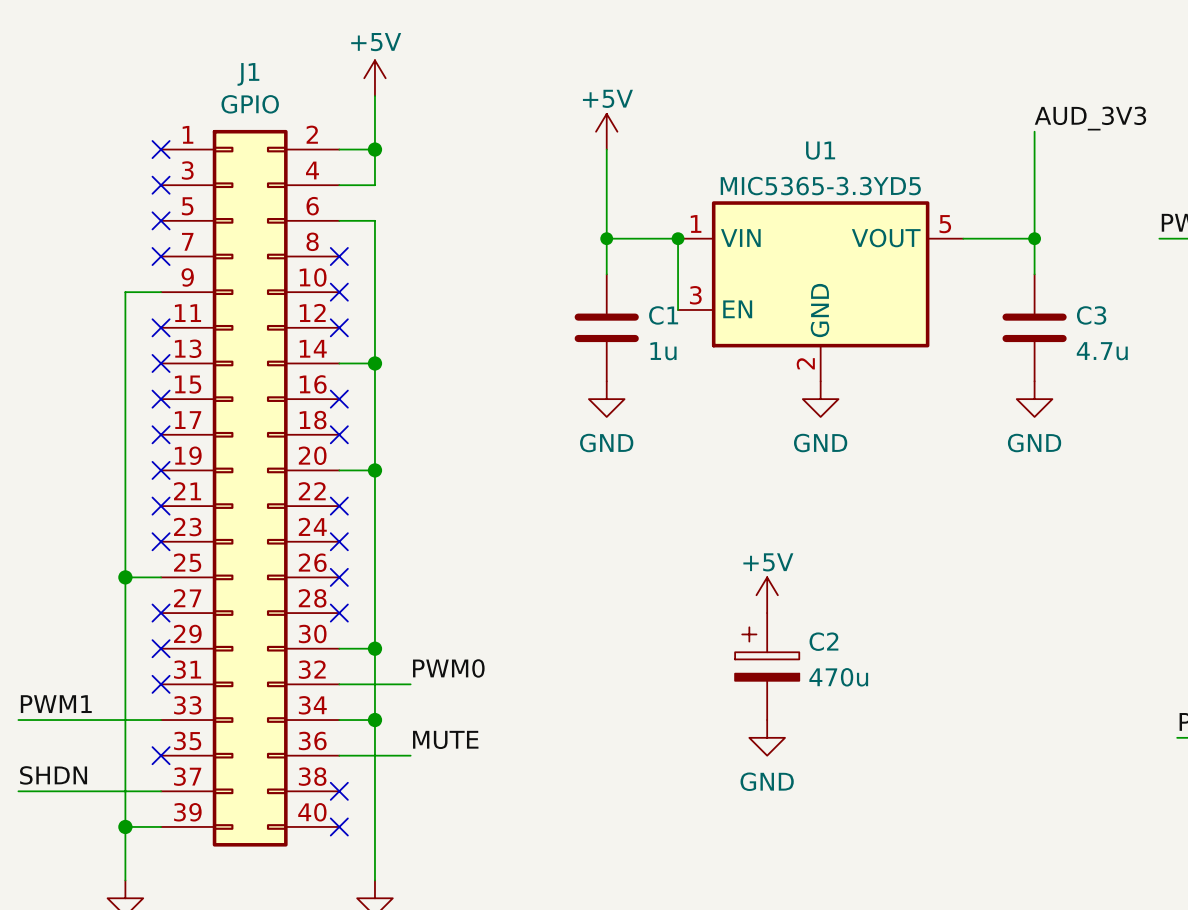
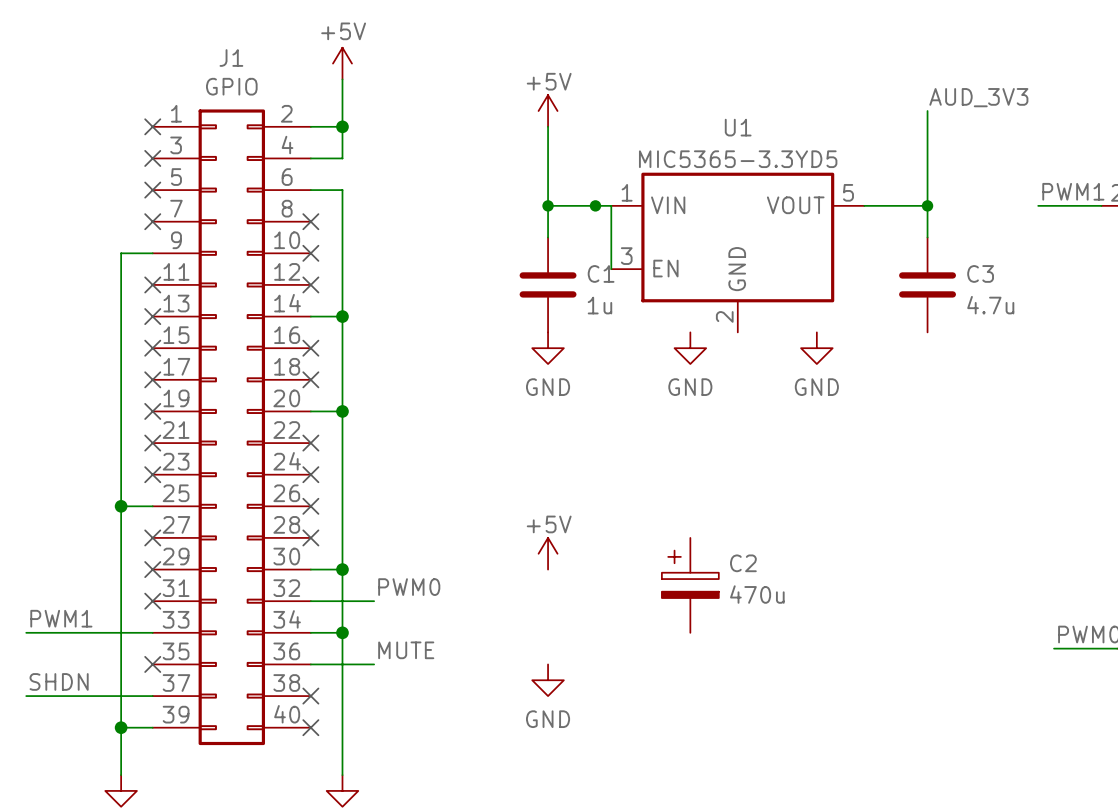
junction position: (678, 238) -> (595, 205)
power symbol: none -> GND (690, 348)
power symbol: GND (820, 399) -> none
power symbol: none -> GND (816, 348)
power symbol: GND (1034, 399) -> none
power symbol position: +5V (767, 595) -> +5V (548, 553)
power symbol position: GND (767, 737) -> GND (548, 680)

